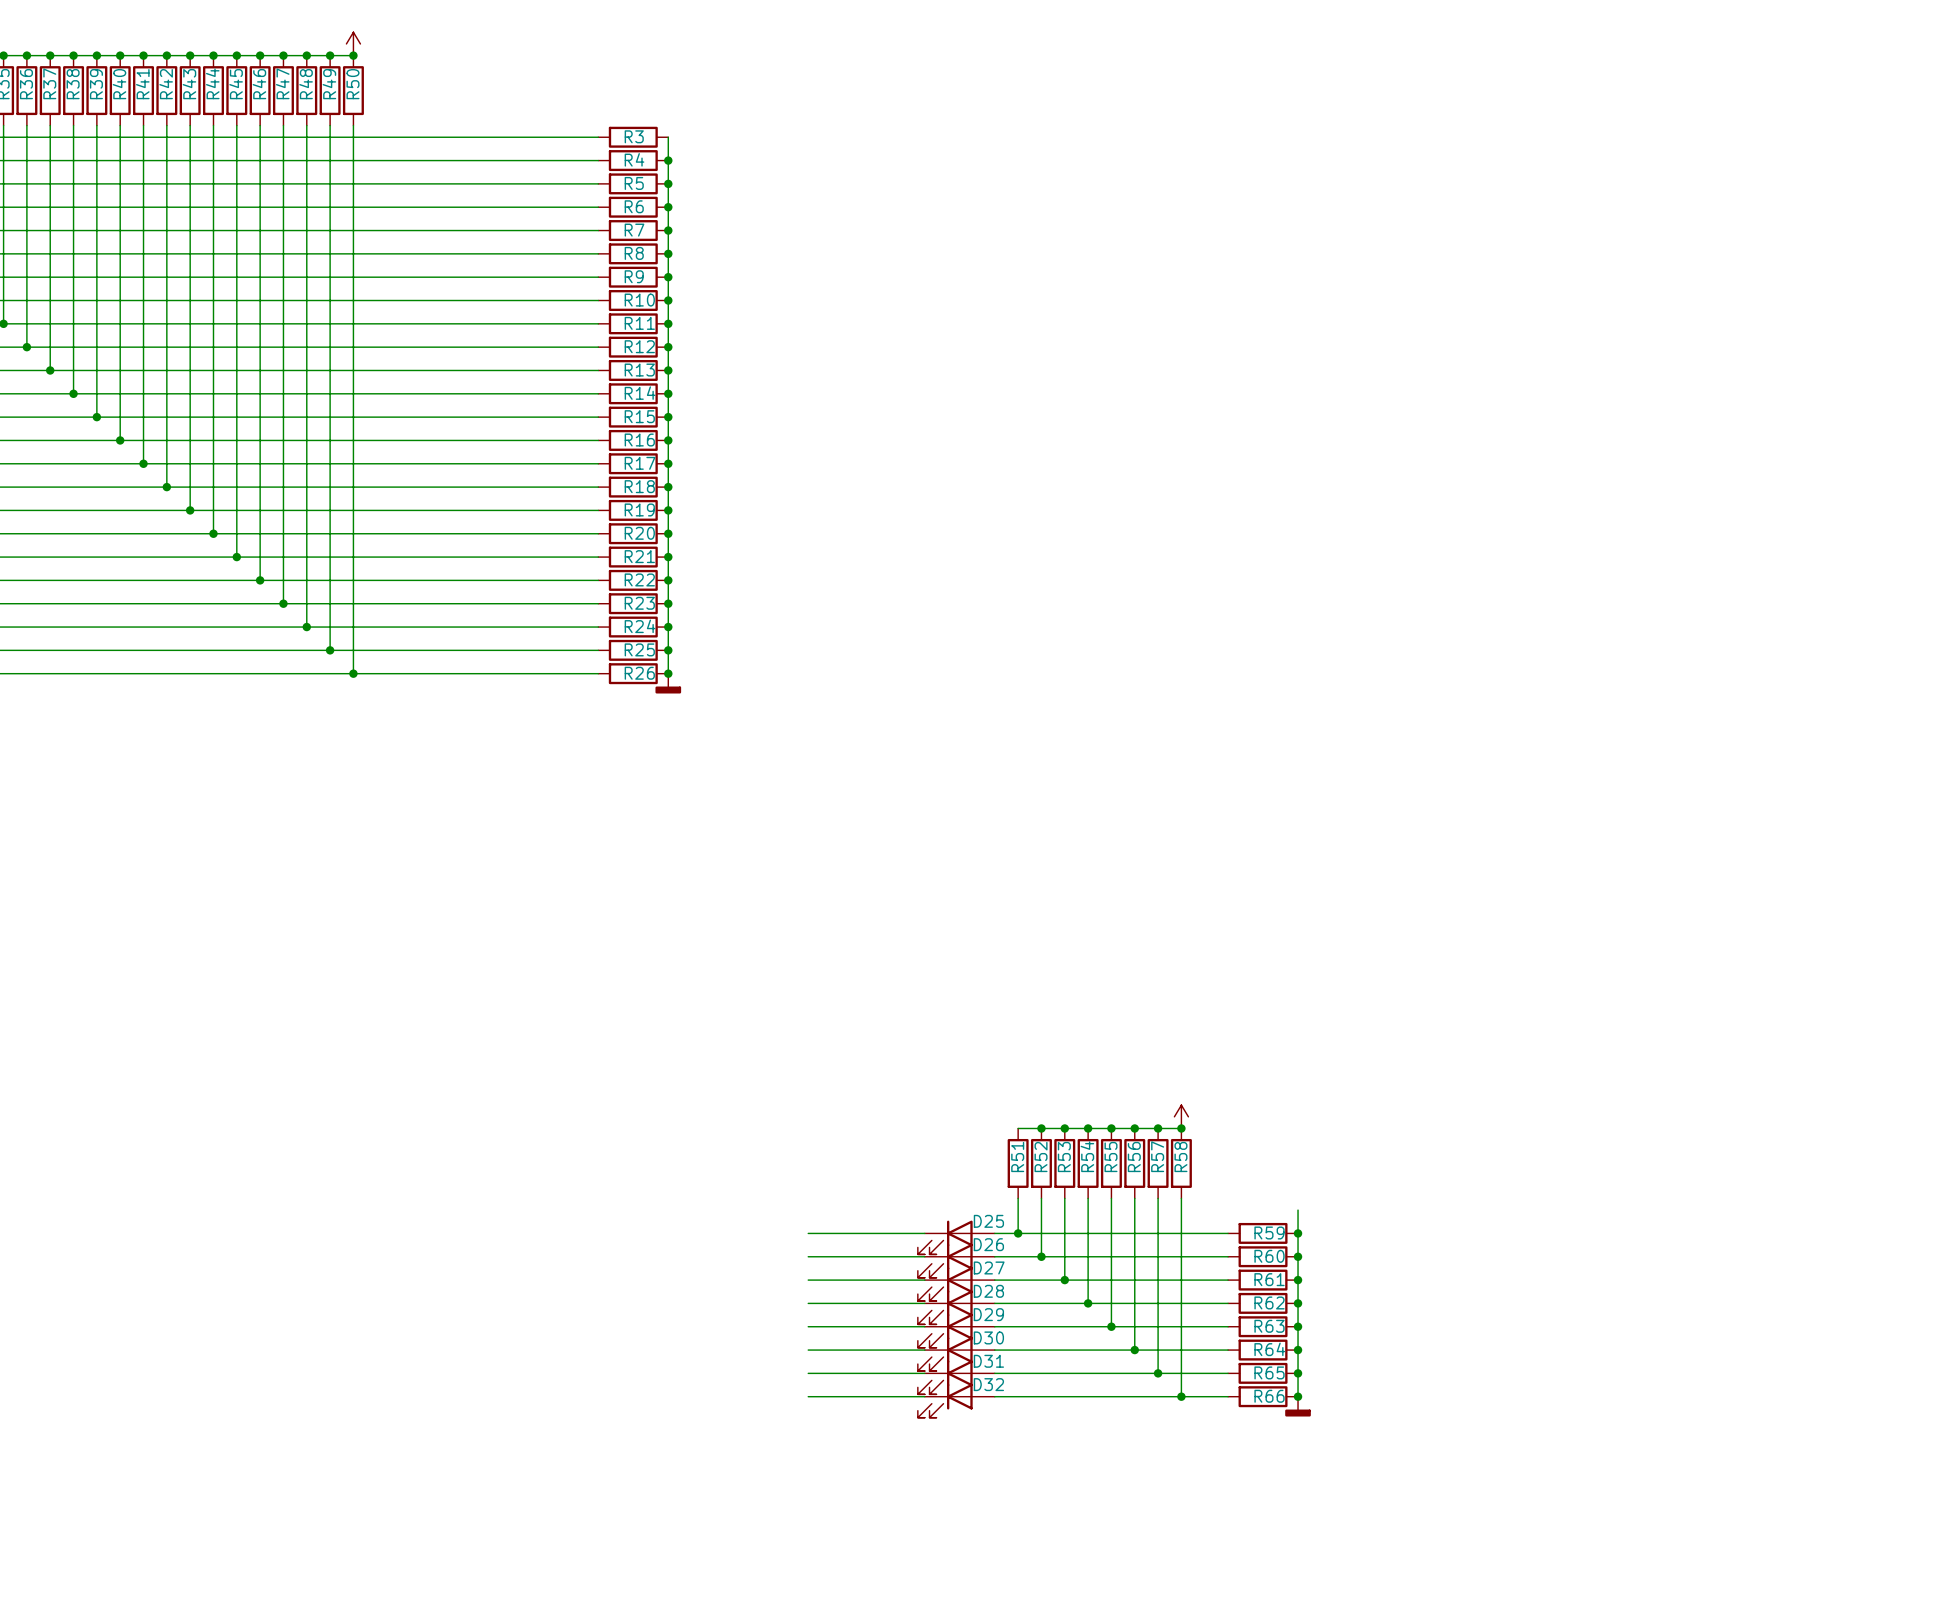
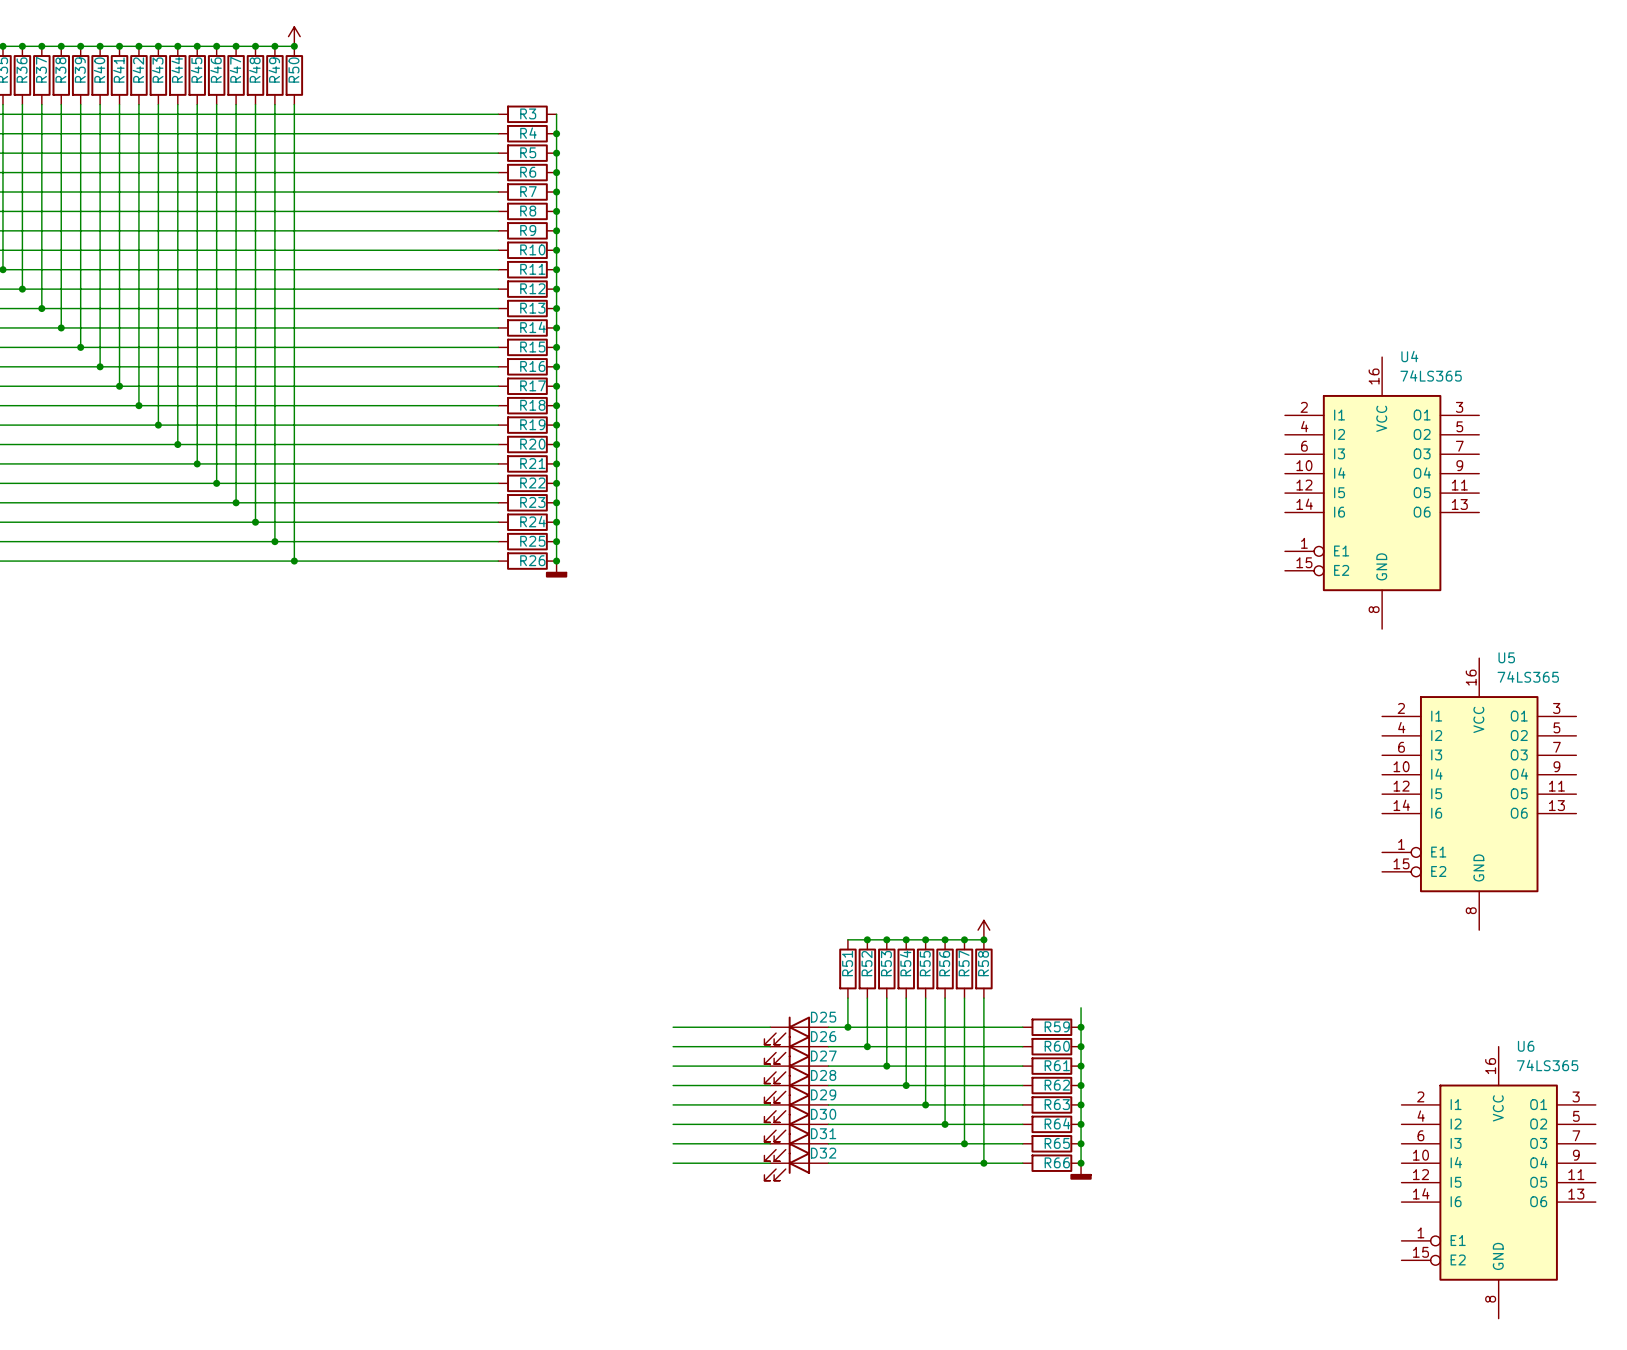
U4: none -> 74LS365 (1382, 493)
U5: none -> 74LS365 (1479, 794)
U6: none -> 74LS365 (1498, 1182)

